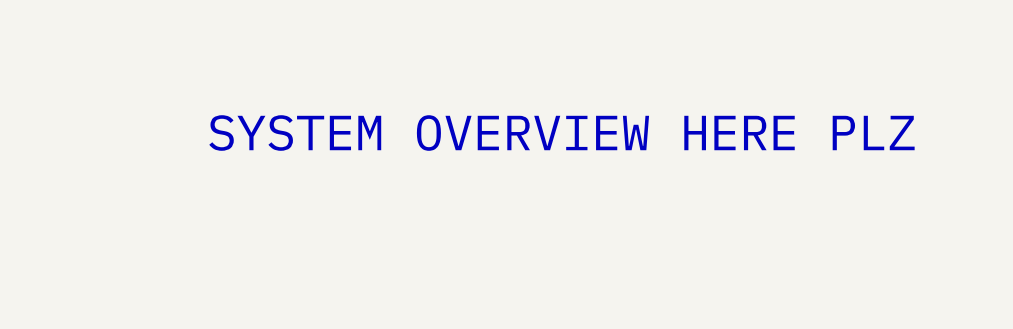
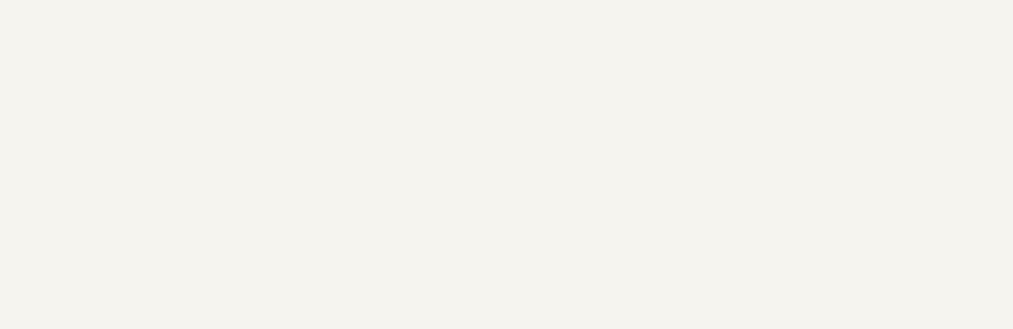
text: SYSTEM OVERVIEW HERE PLZ (561, 133) -> none

